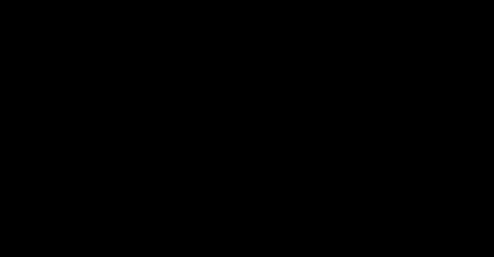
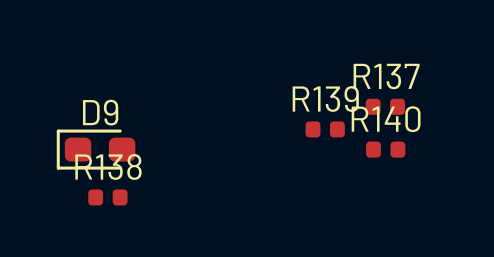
R137: none -> (385, 106)
R139: none -> (325, 129)
D9: none -> (96, 149)
R140: none -> (385, 149)
R138: none -> (107, 197)

